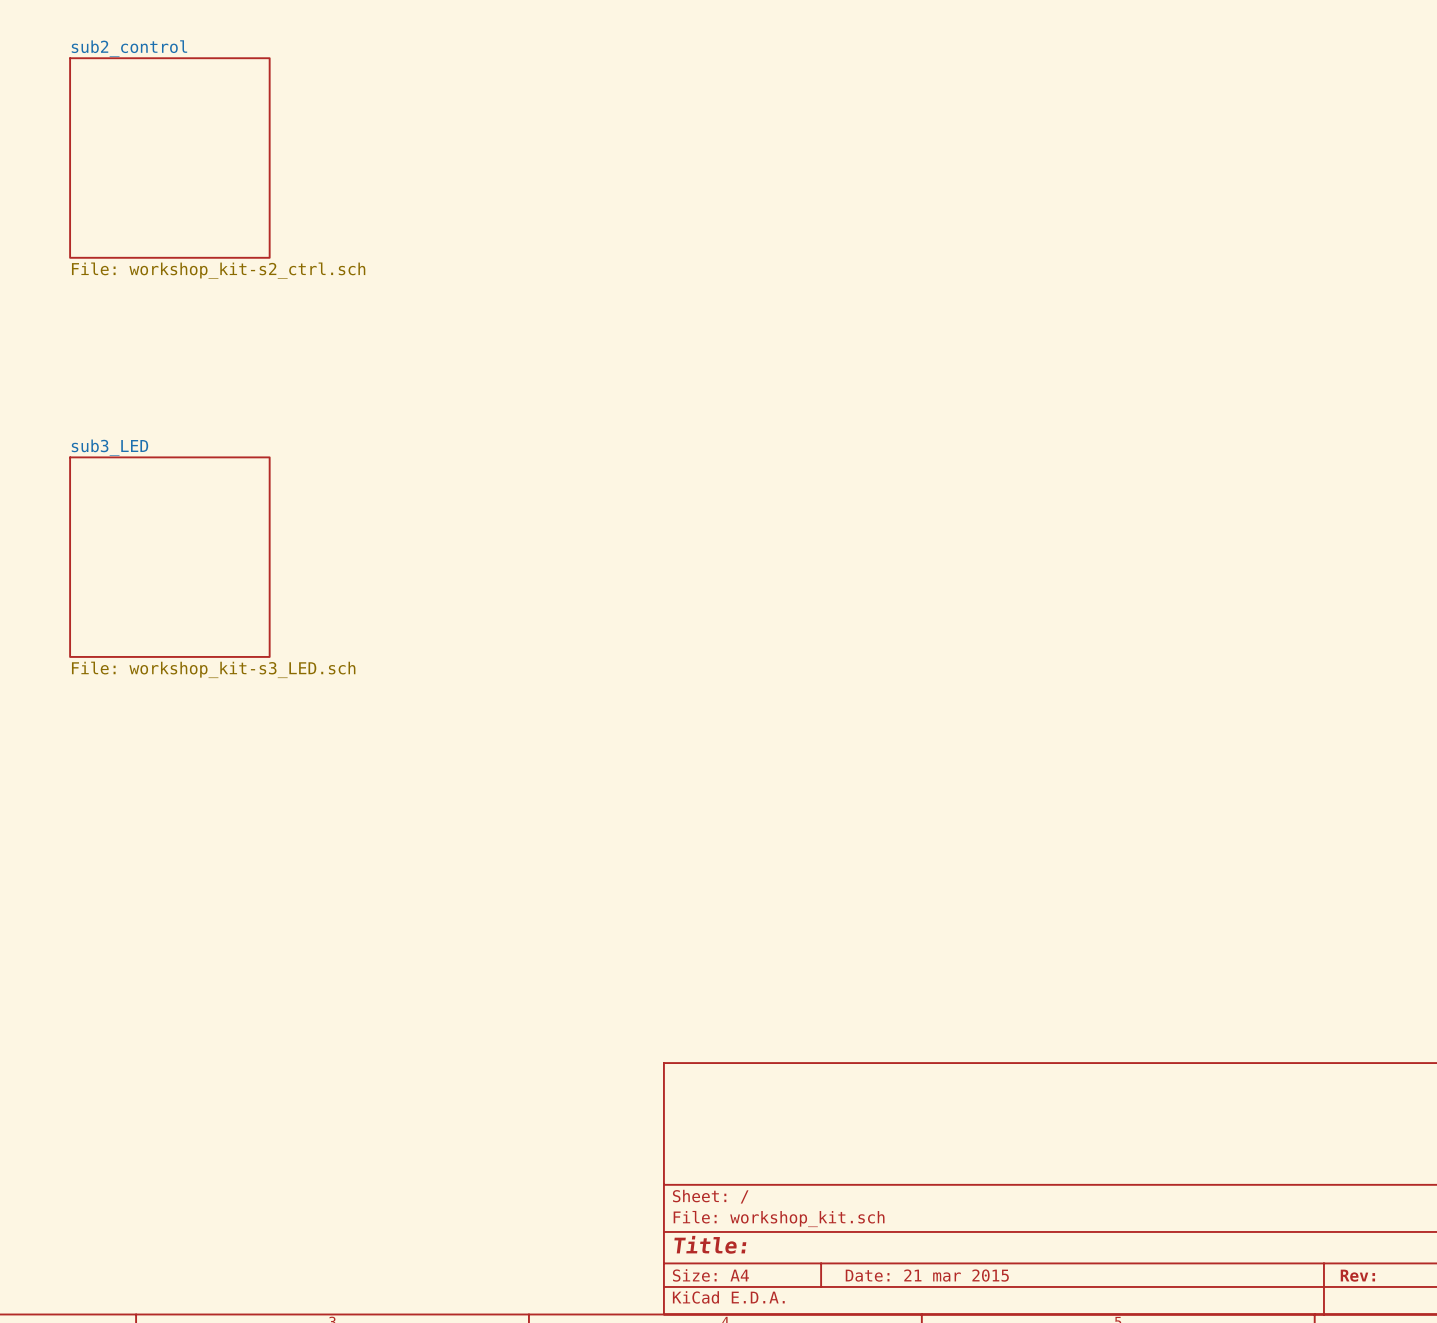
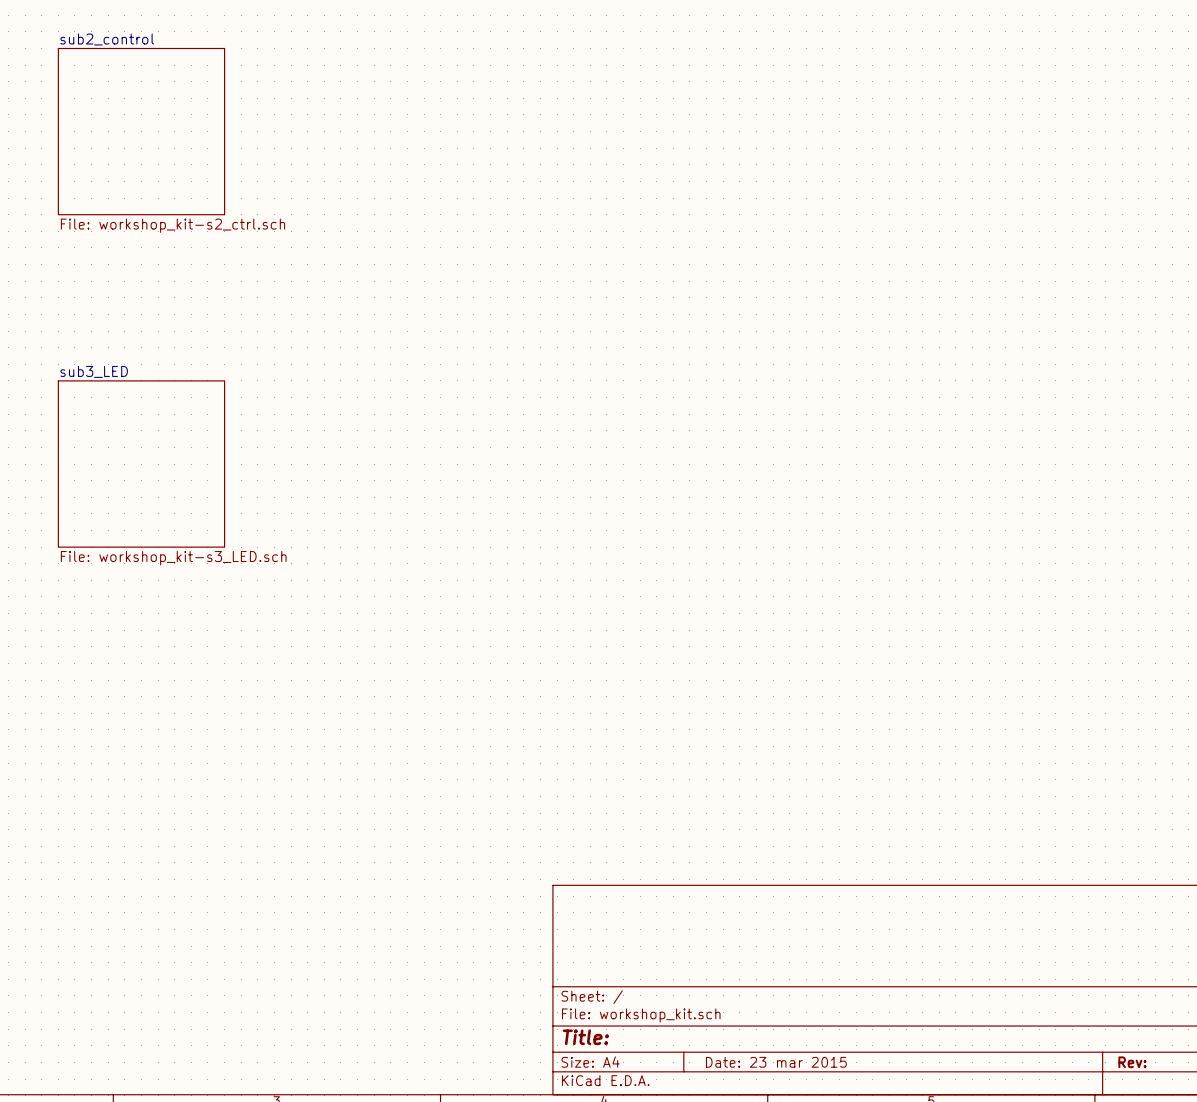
title block: Date: 21 mar 2015 (927, 1275) -> Date: 23 mar 2015 (776, 1062)

